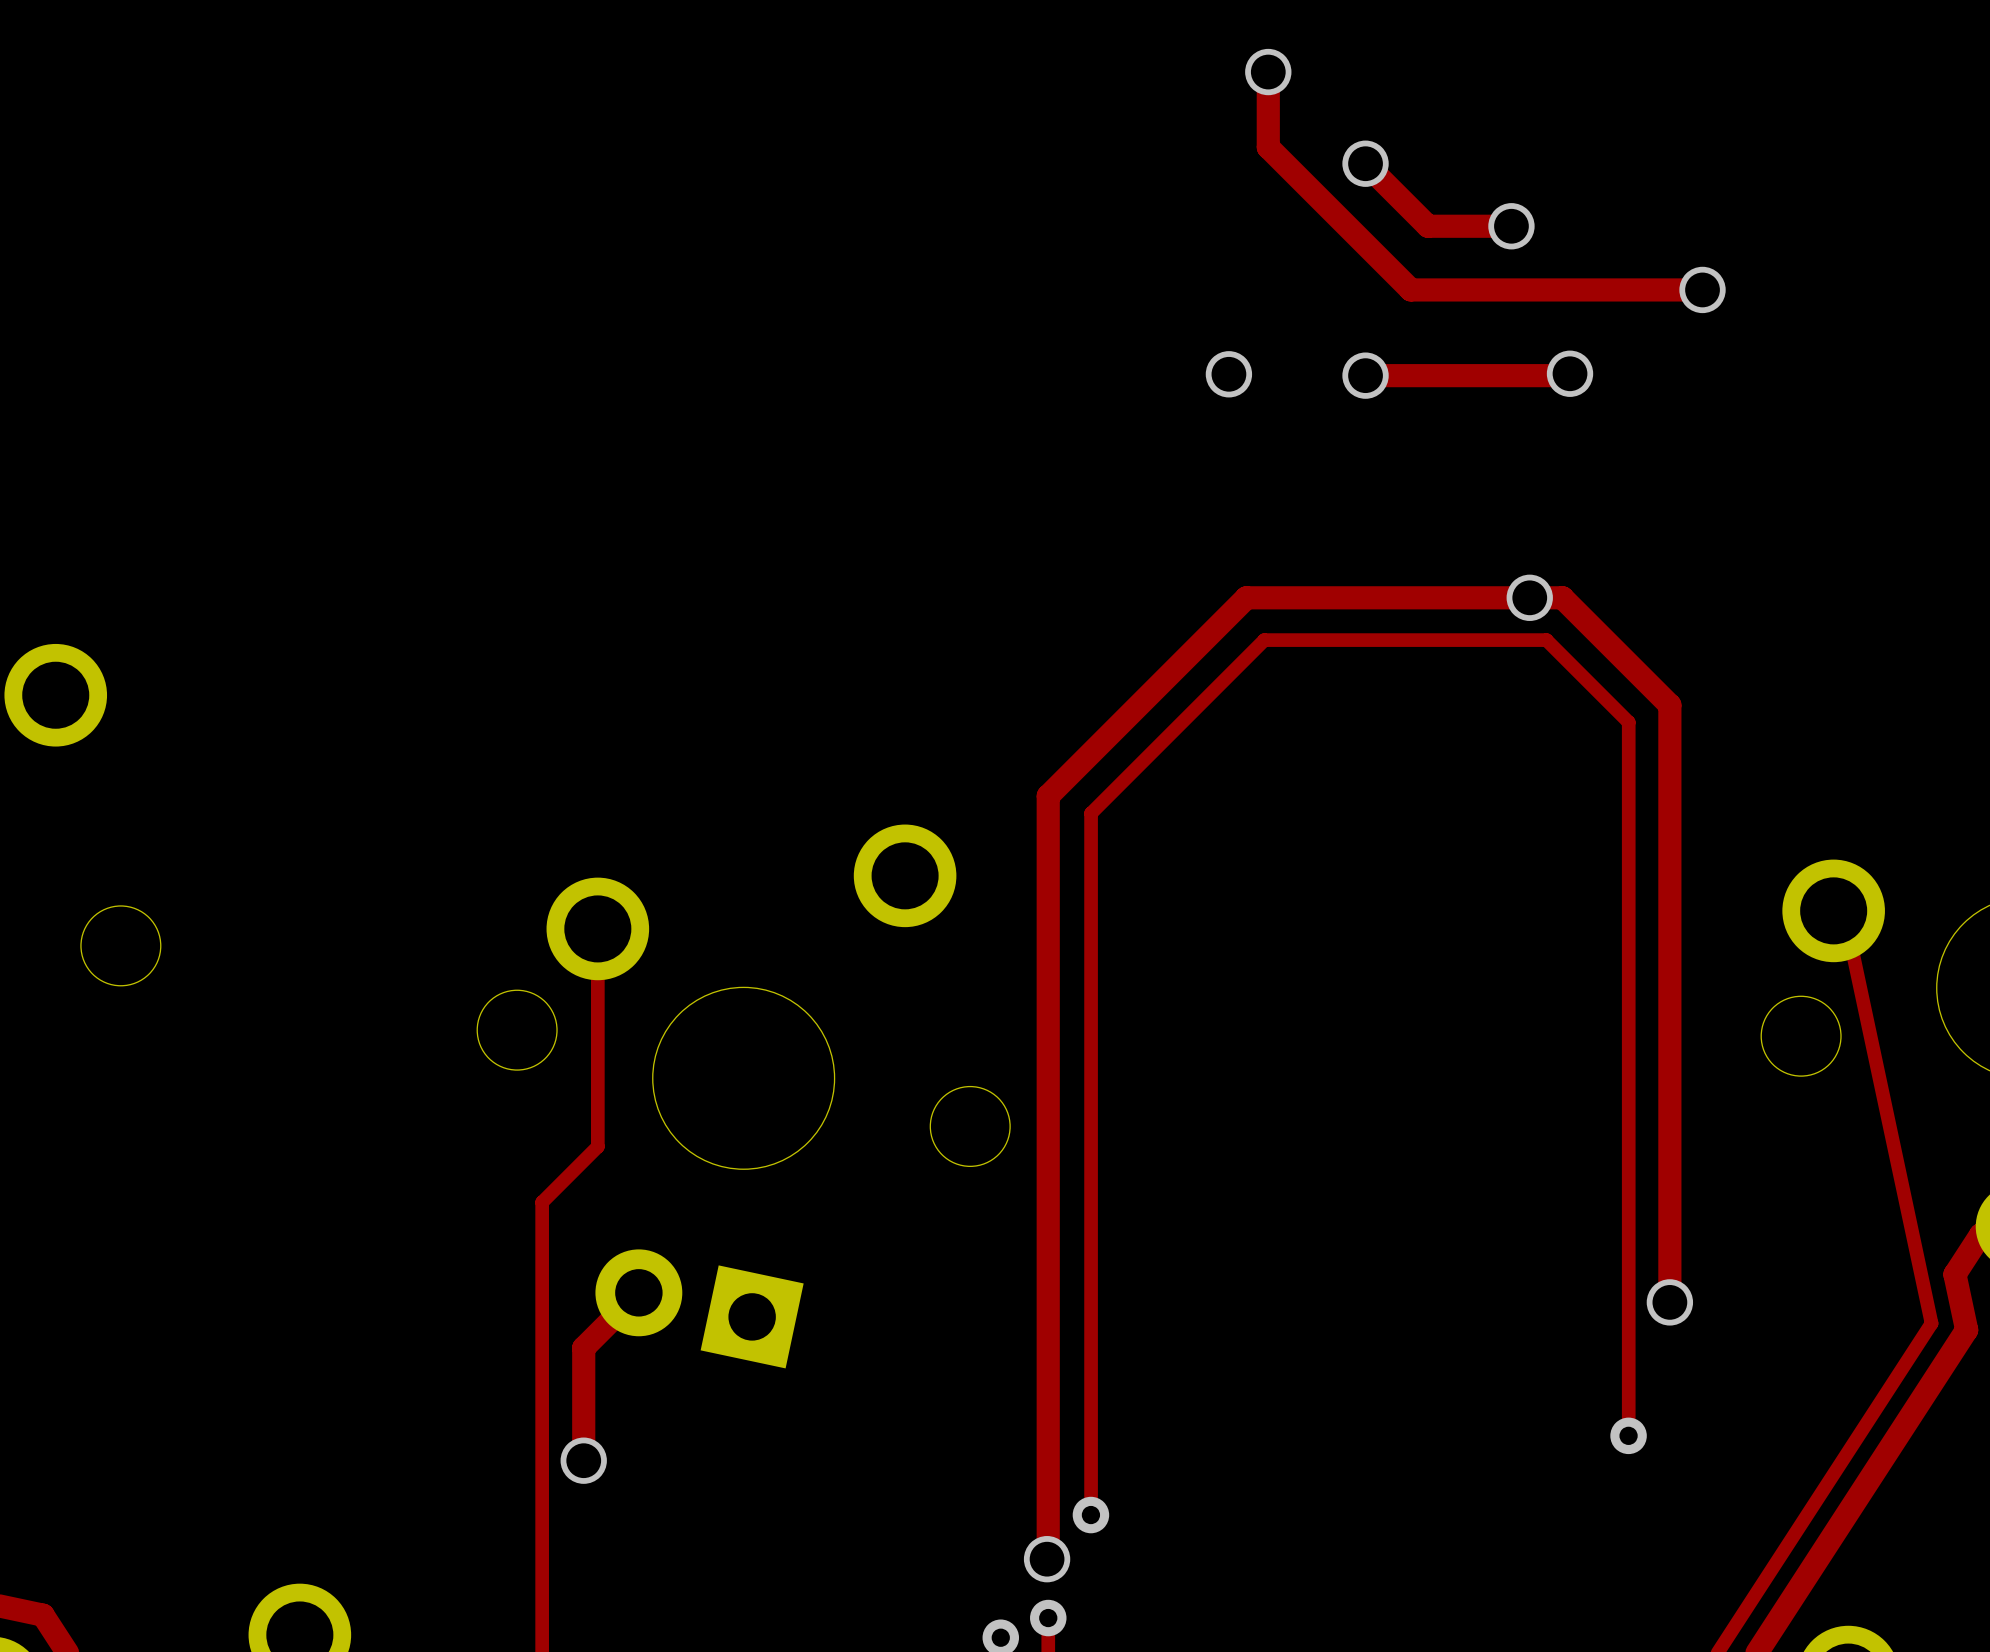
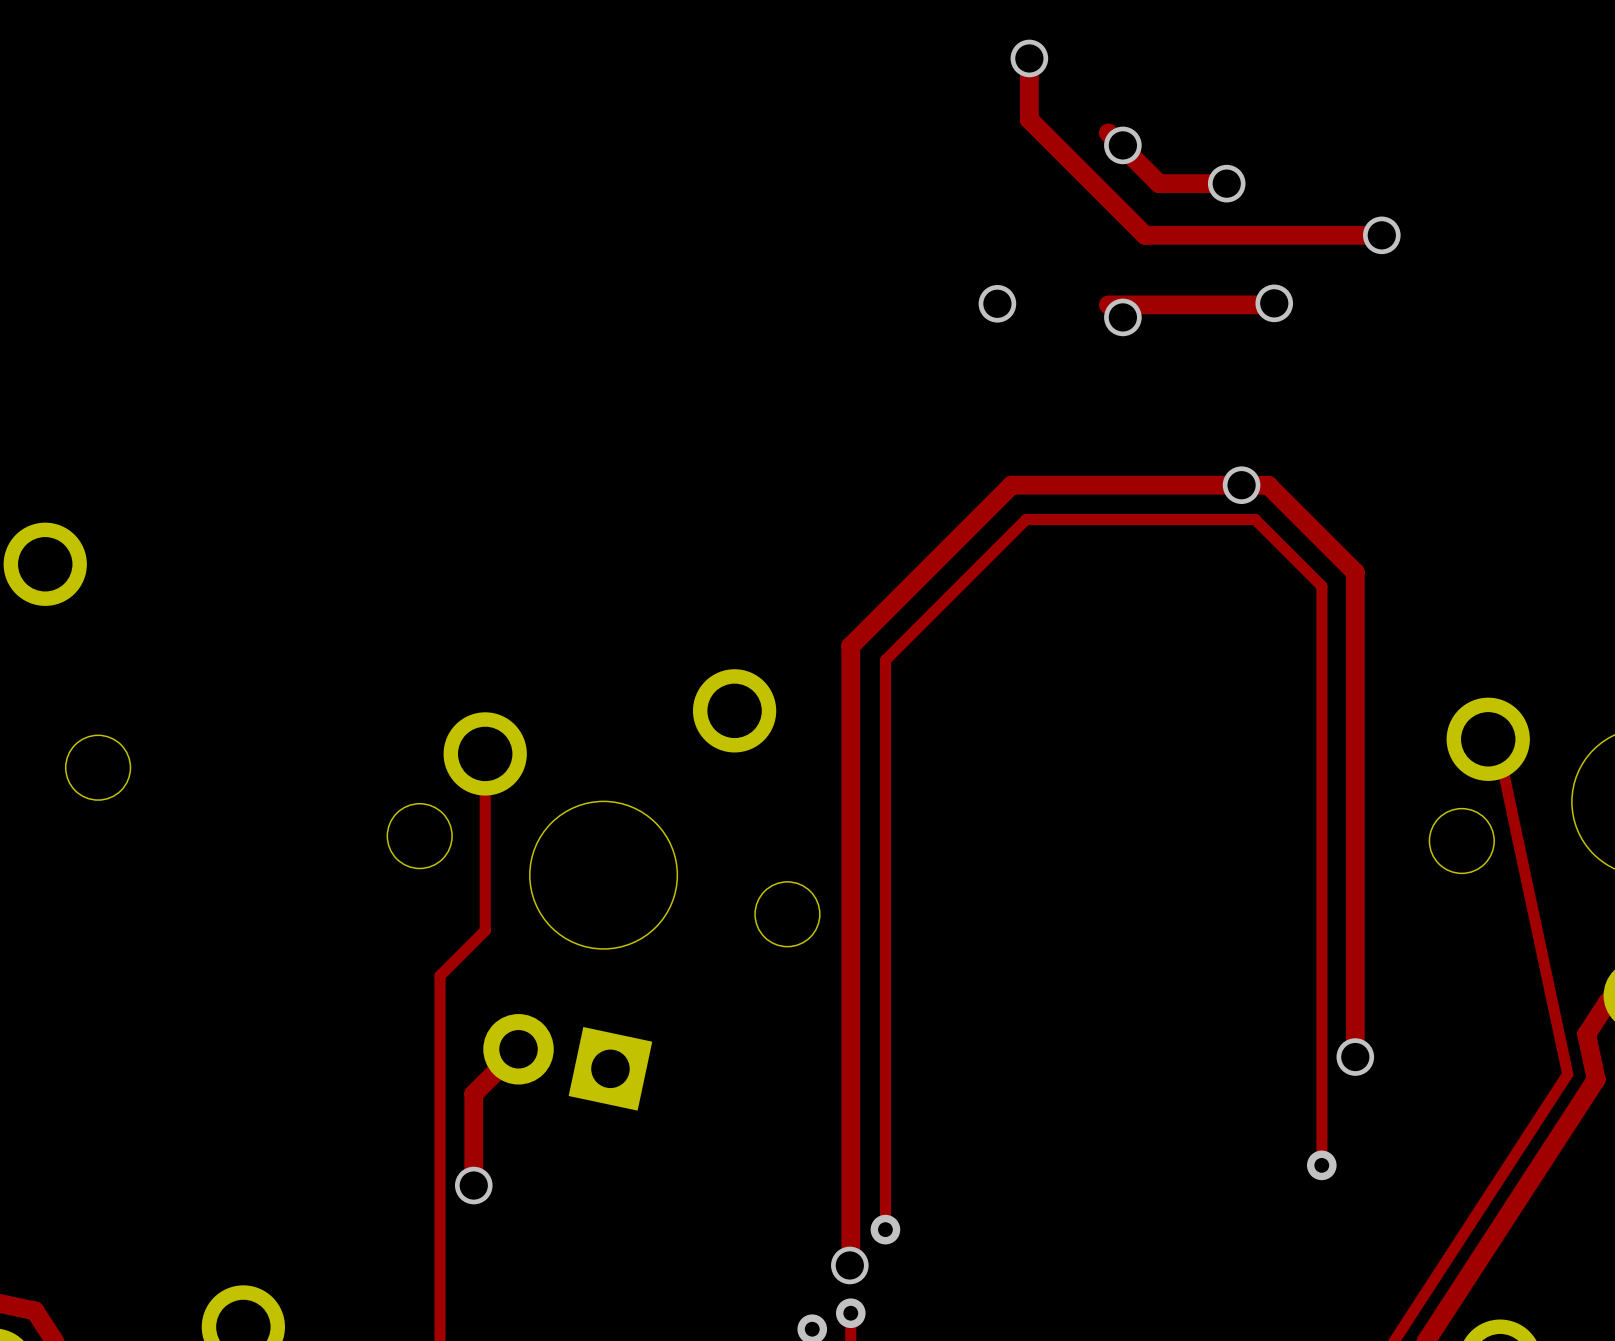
via position: (1365, 163) -> (1122, 145)
via position: (1365, 375) -> (1122, 317)

